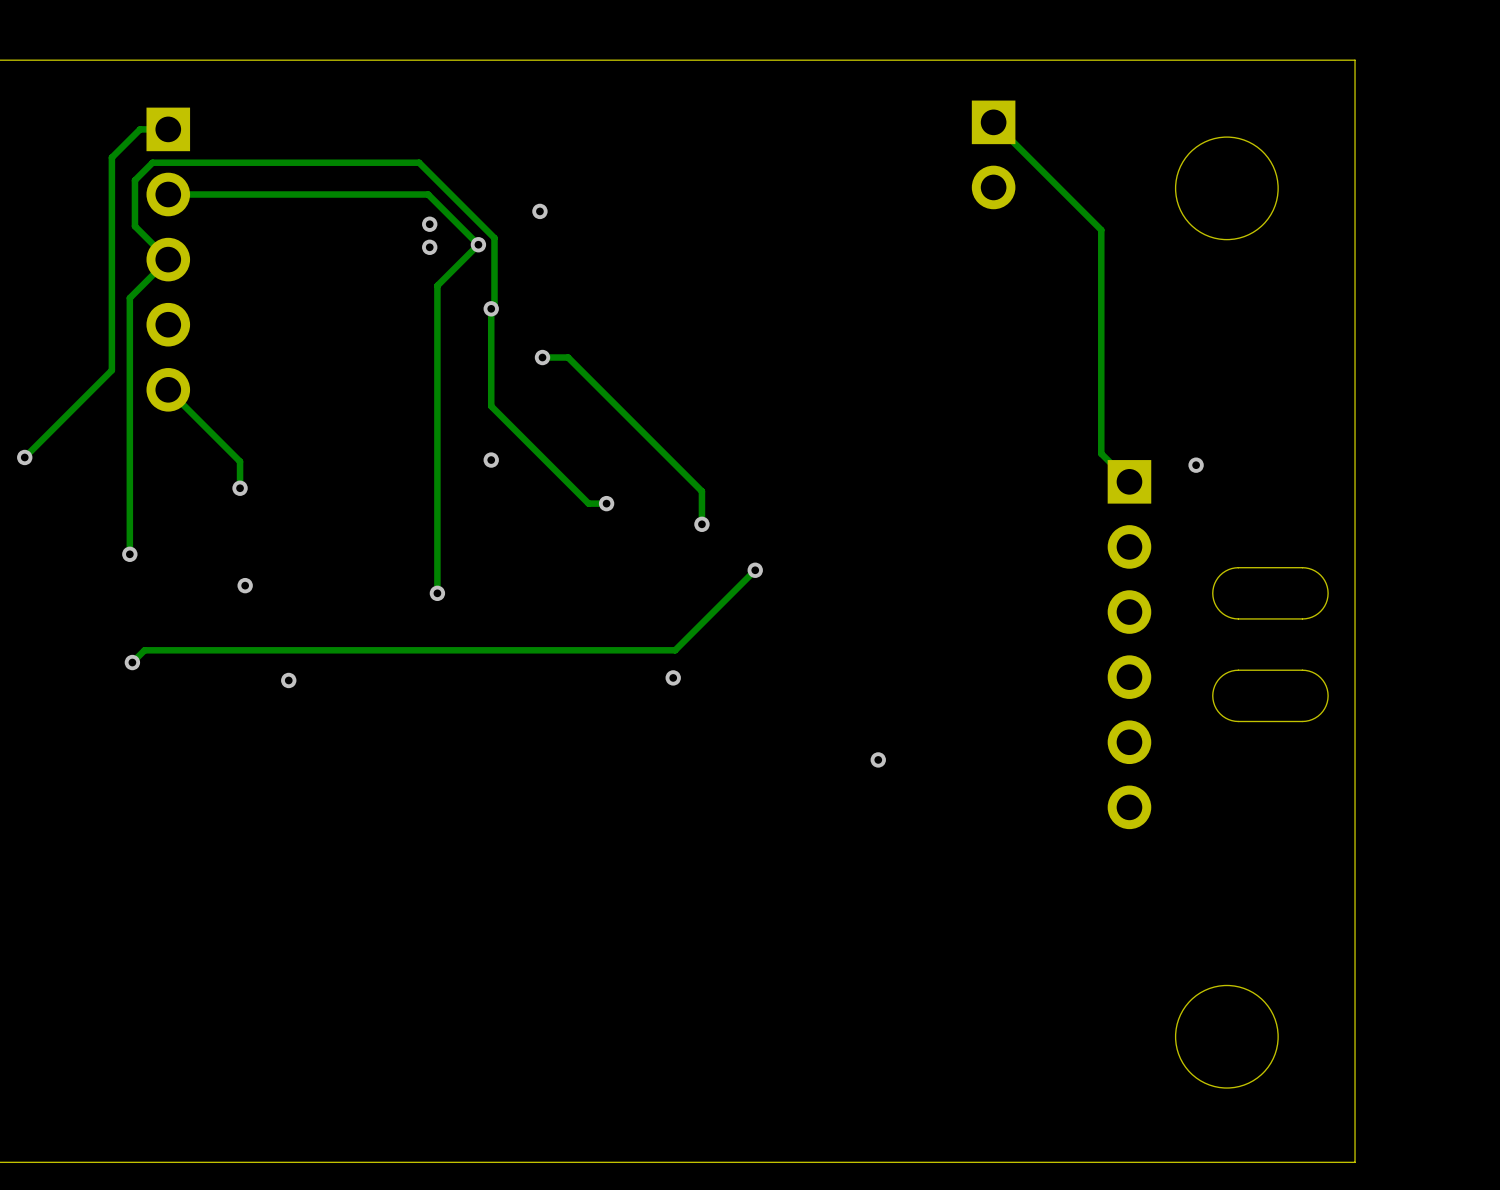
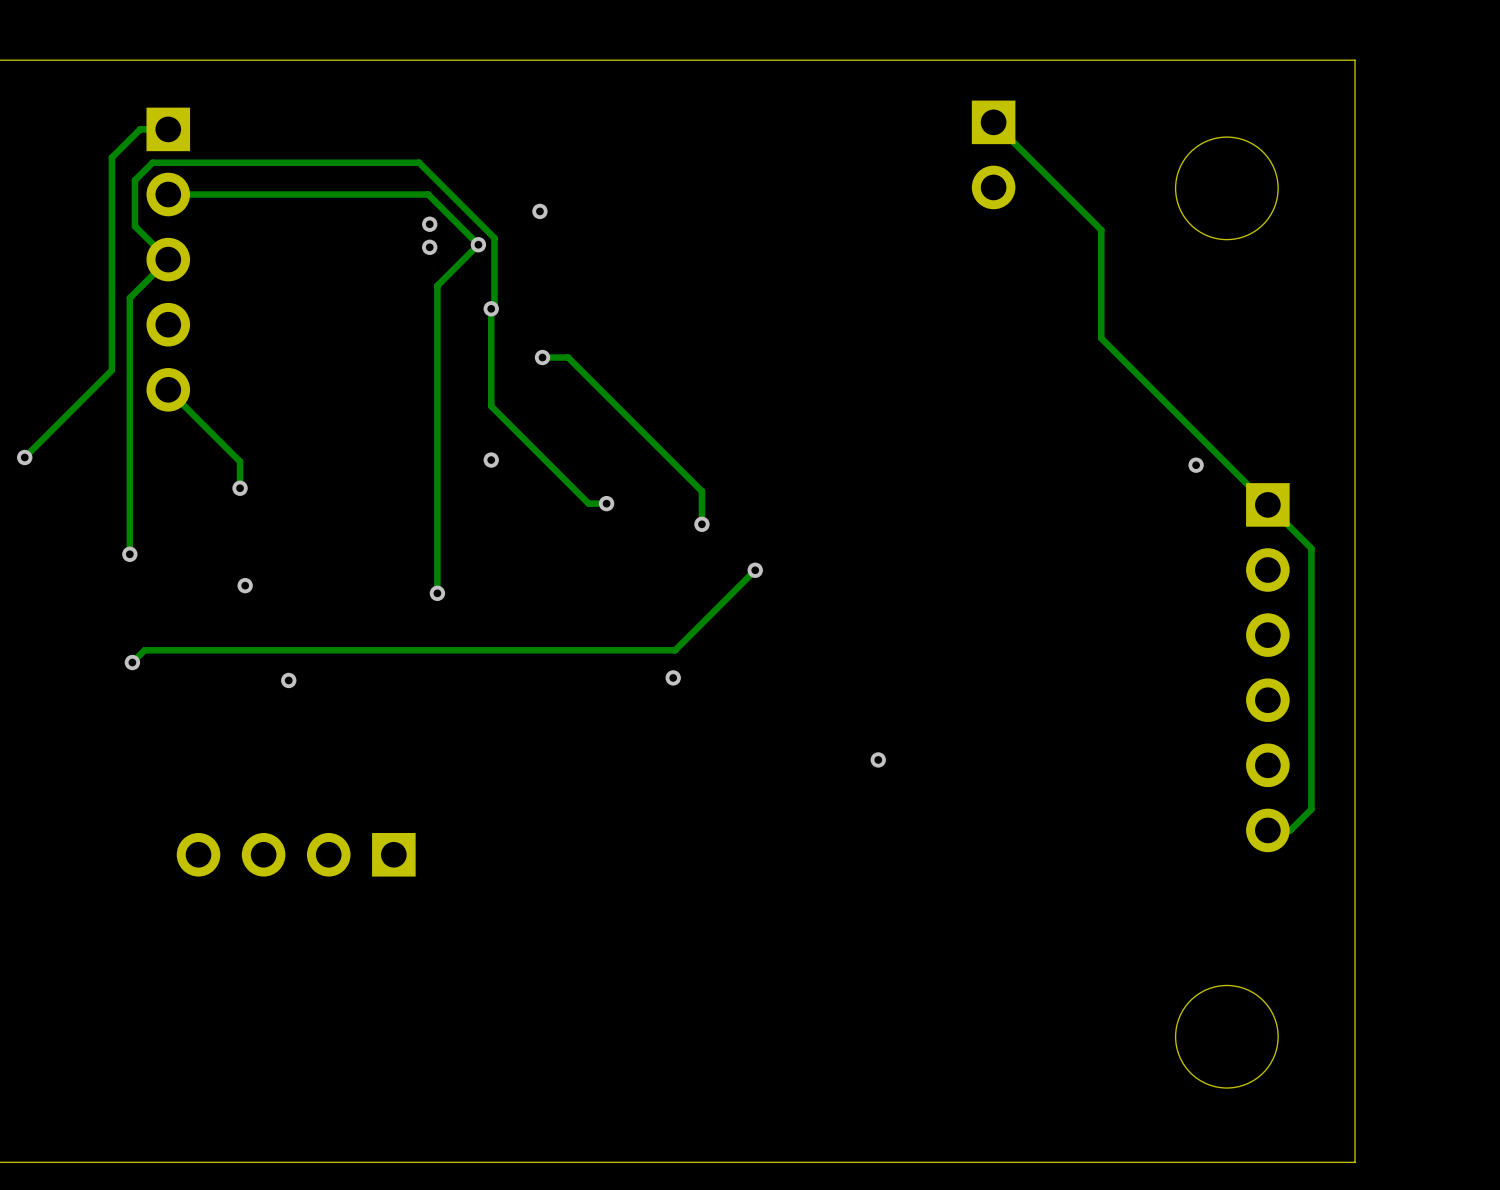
track: (1101, 338) (1101, 453) (1129, 481) -> (1101, 338) (1311, 548) (1311, 809) (1290, 830) (1267, 830)
drawing: [1212, 567, 1329, 620] -> none
part position: (1129, 644) -> (1267, 667)
drawing: [1212, 669, 1329, 723] -> none
part: none -> (296, 854)

